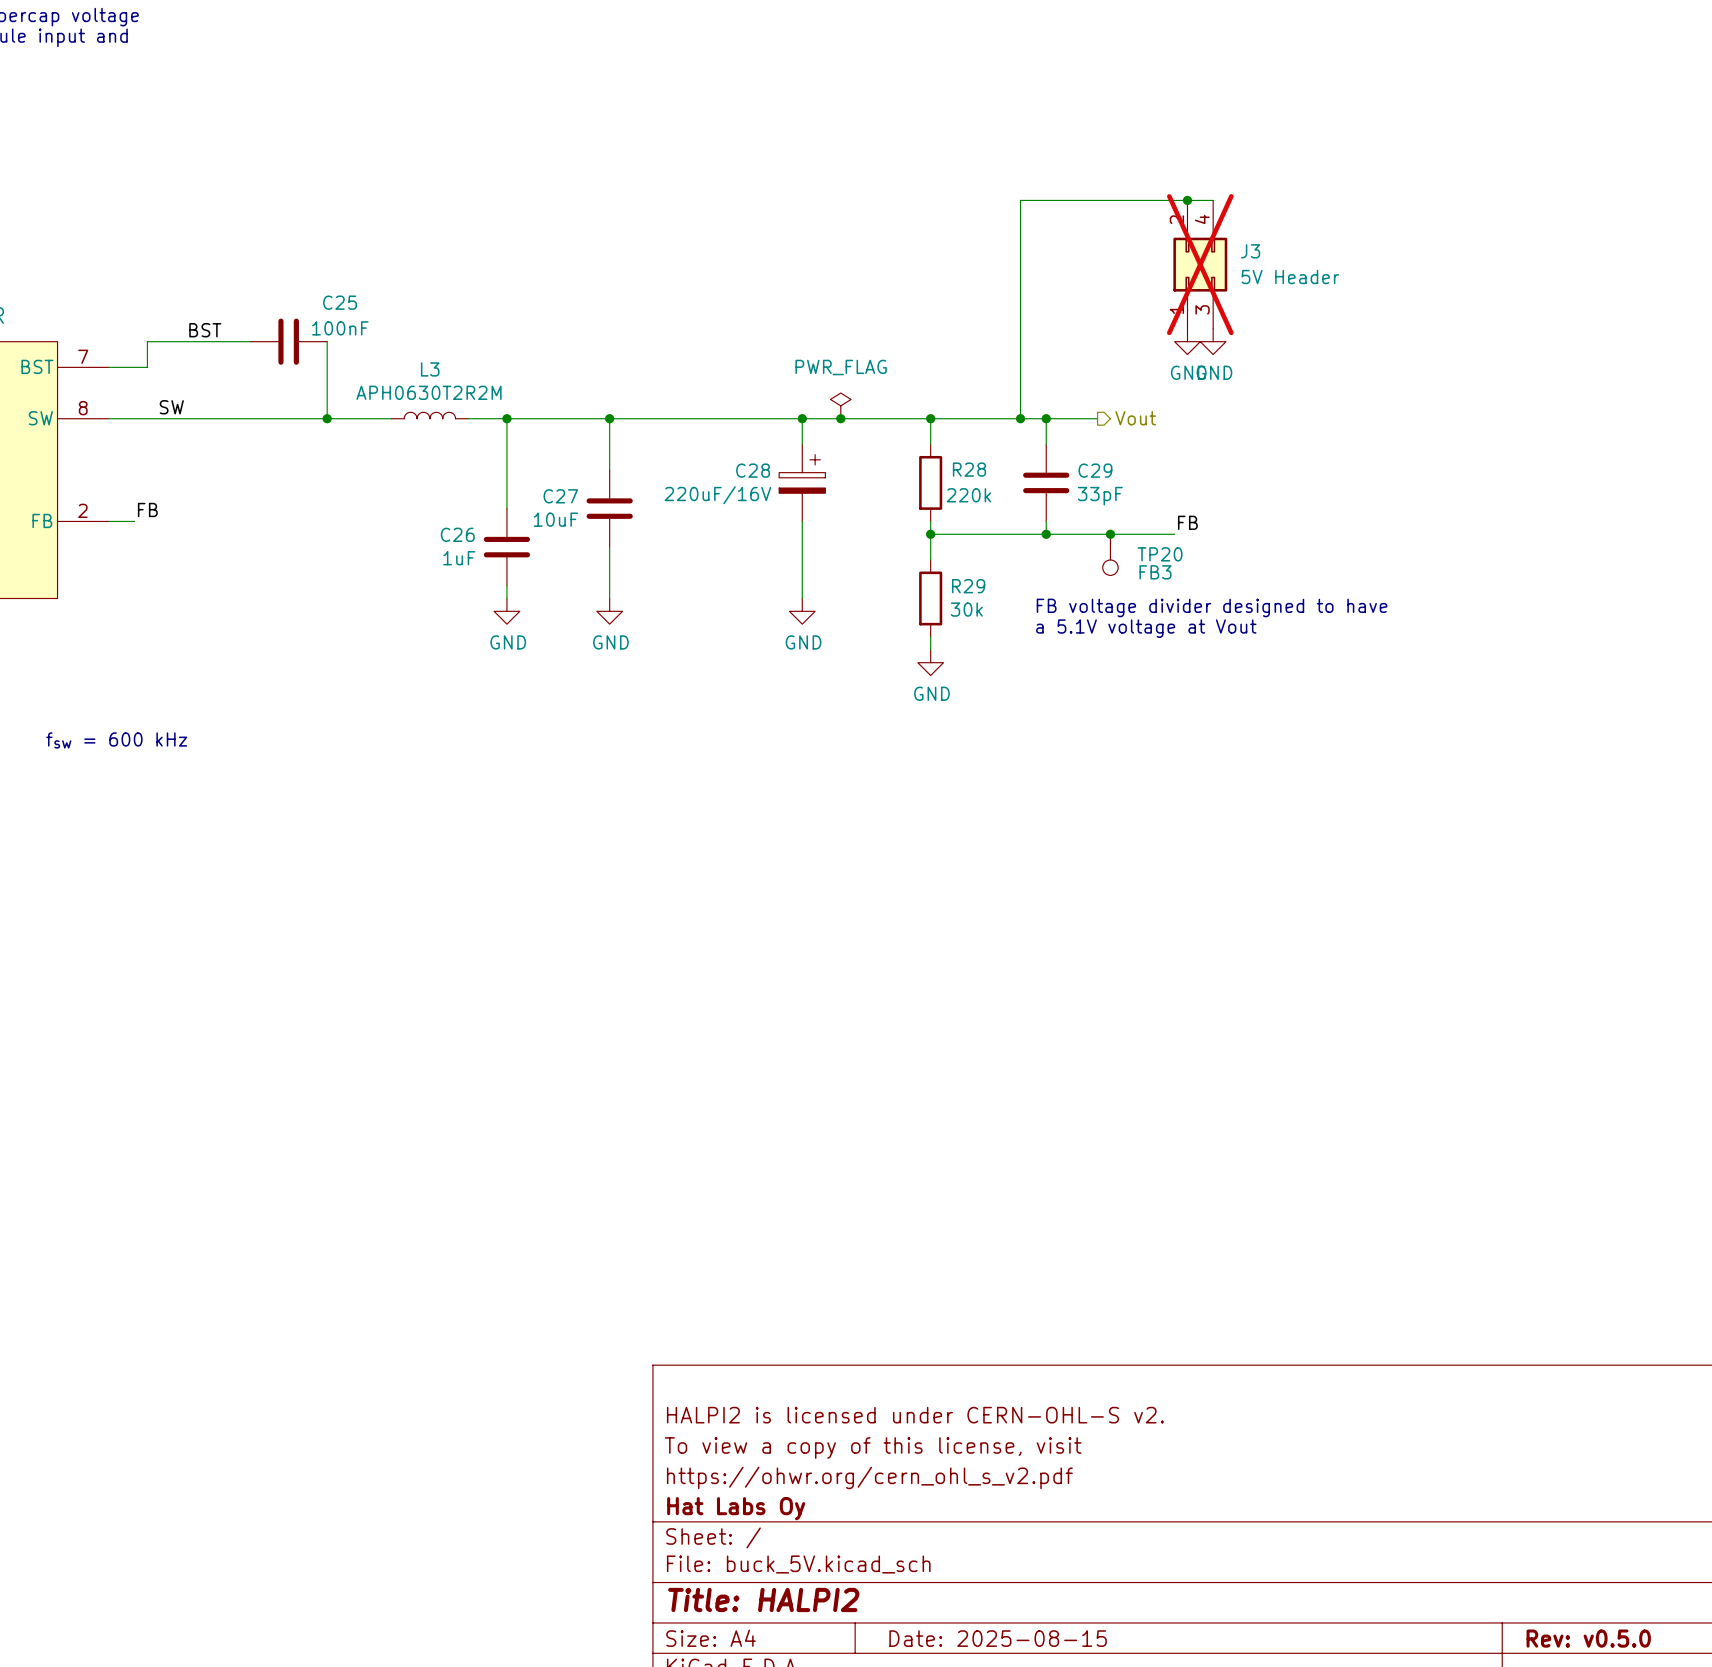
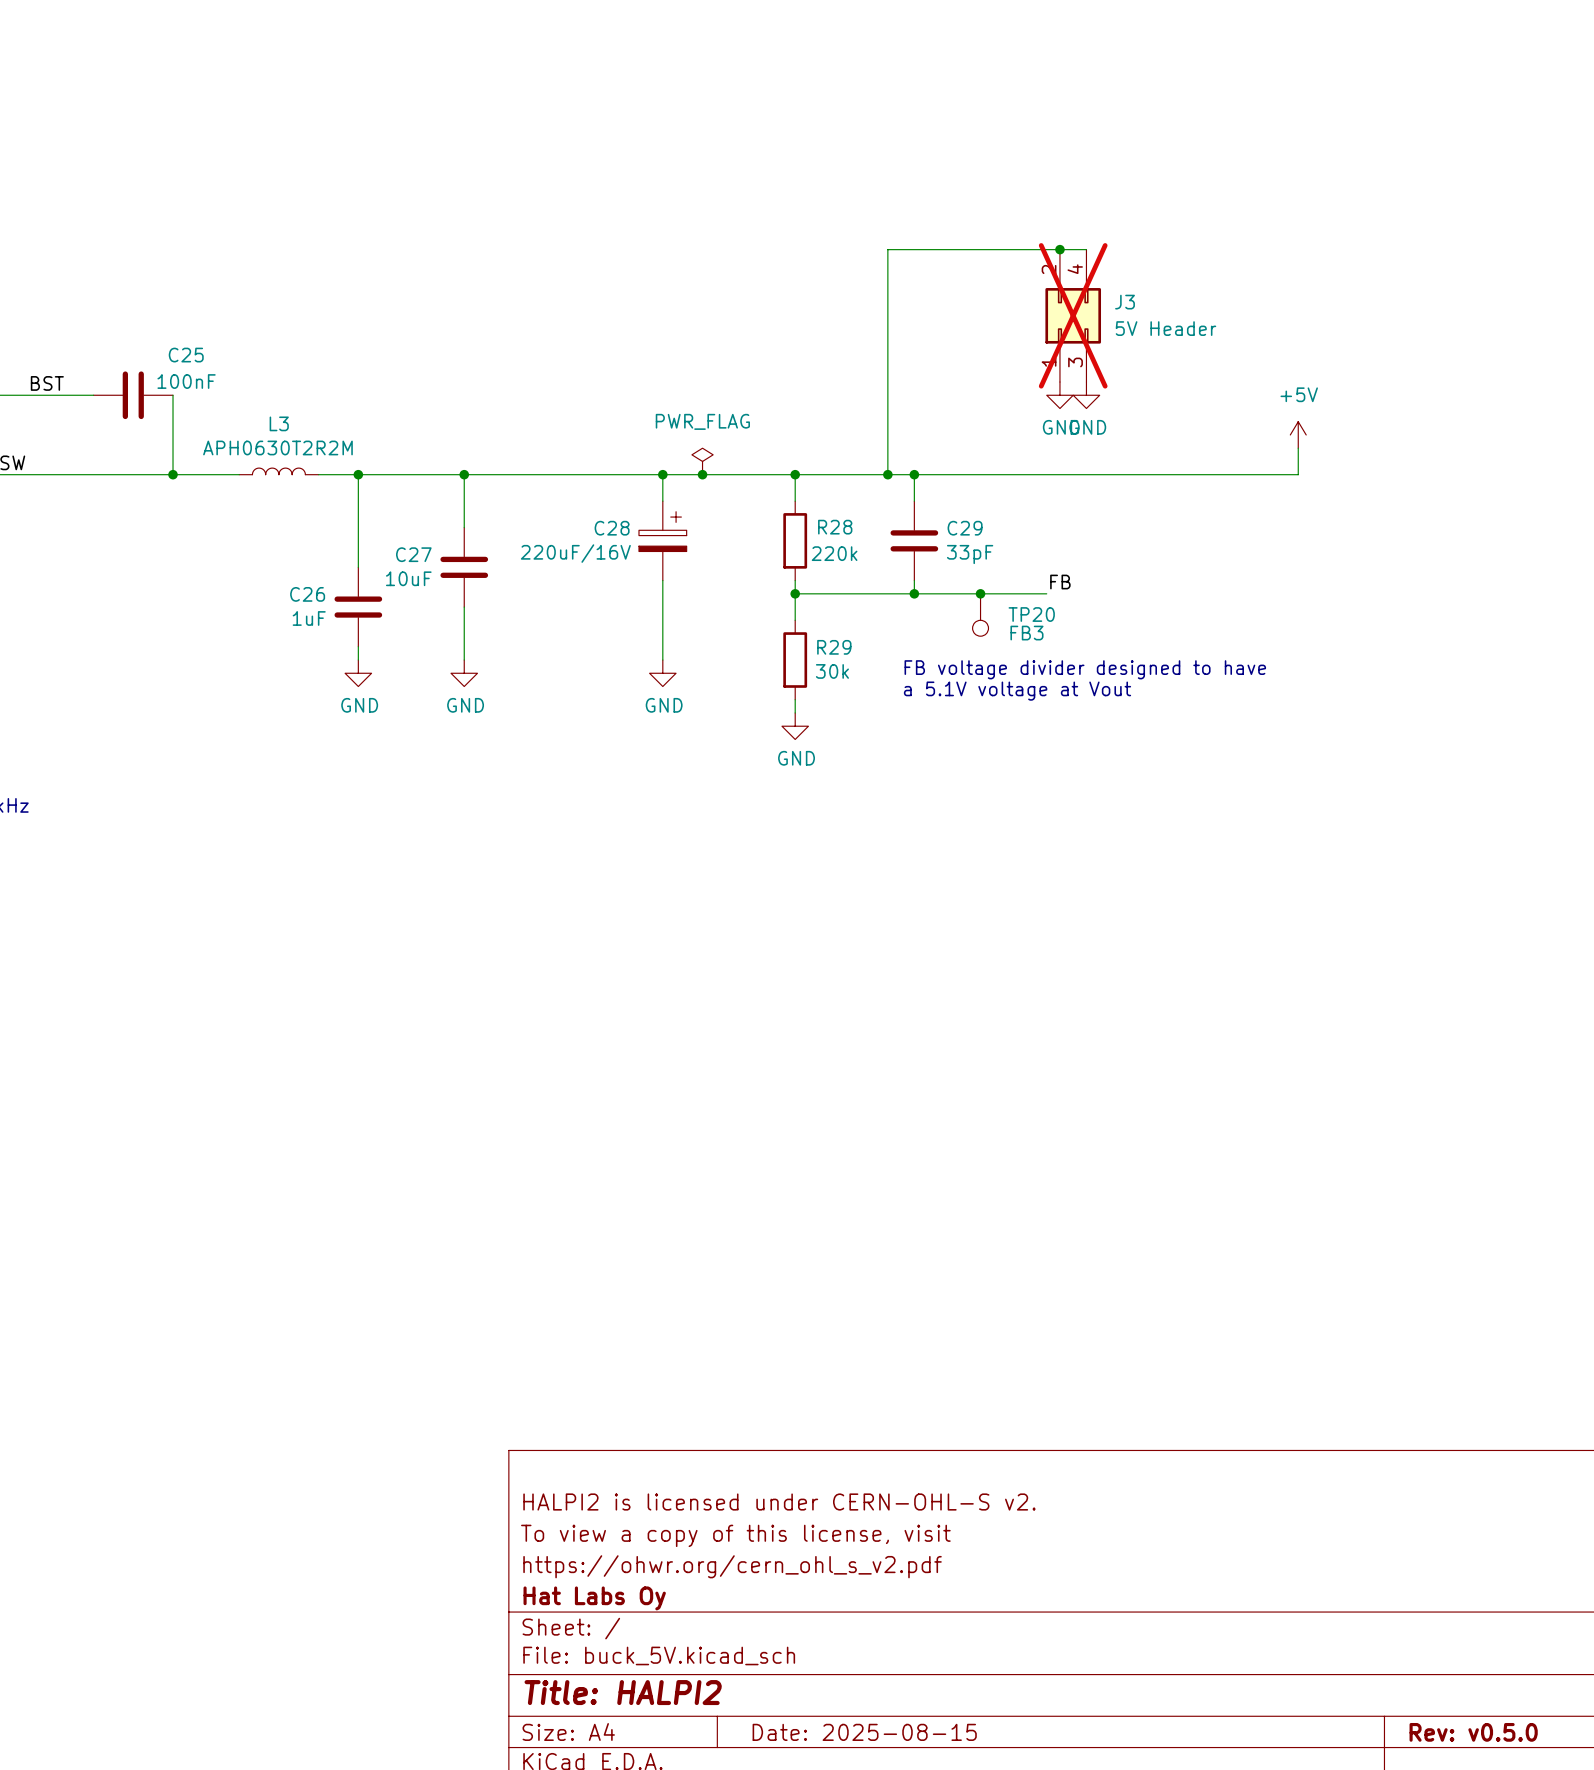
power symbol: none -> +5V (1298, 434)
wire: none -> (1298, 448) (1298, 474) (967, 474)
hierarchical label: Vout (1135, 418) -> none

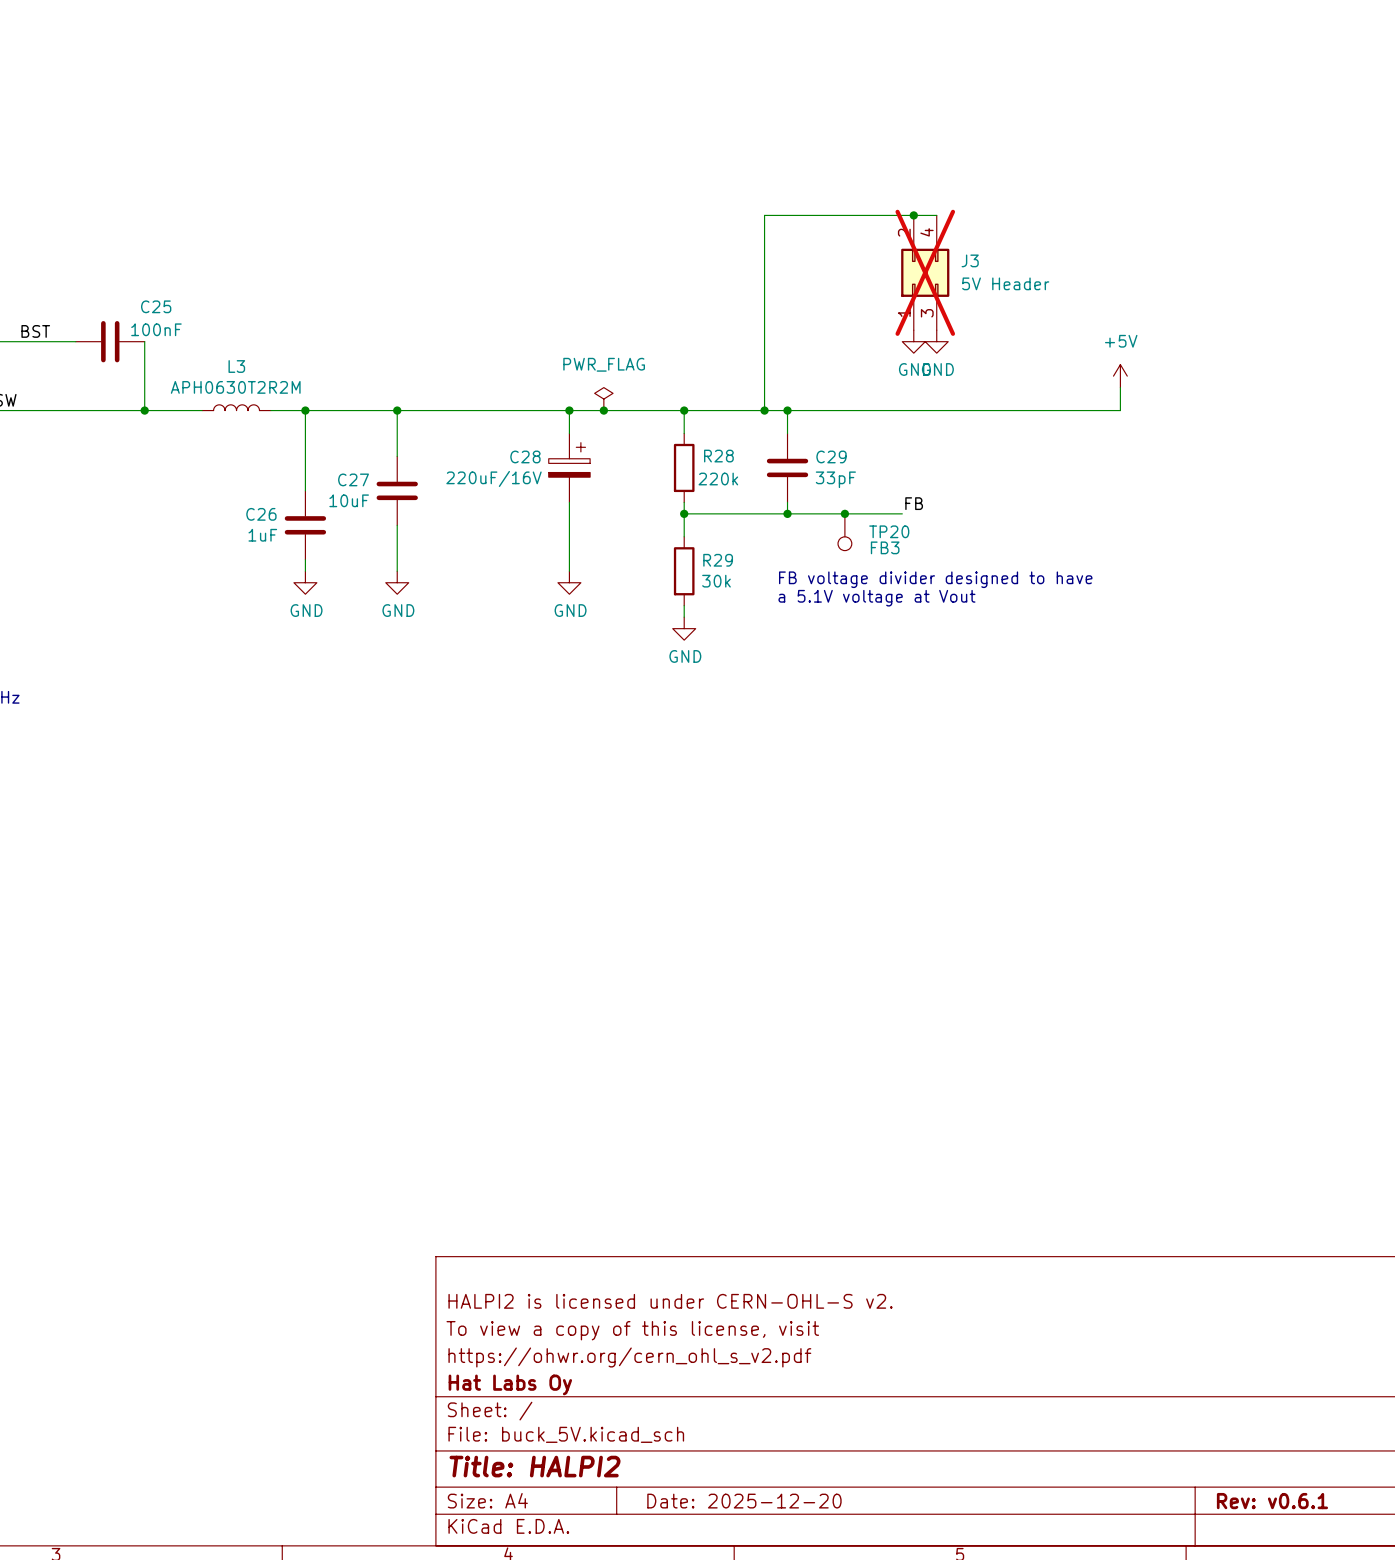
title block: Date: 2025-08-15 (864, 1732) -> Date: 2025-12-20 (744, 1501)
title block: Rev: v0.5.0 (1473, 1732) -> Rev: v0.6.1 (1272, 1501)

